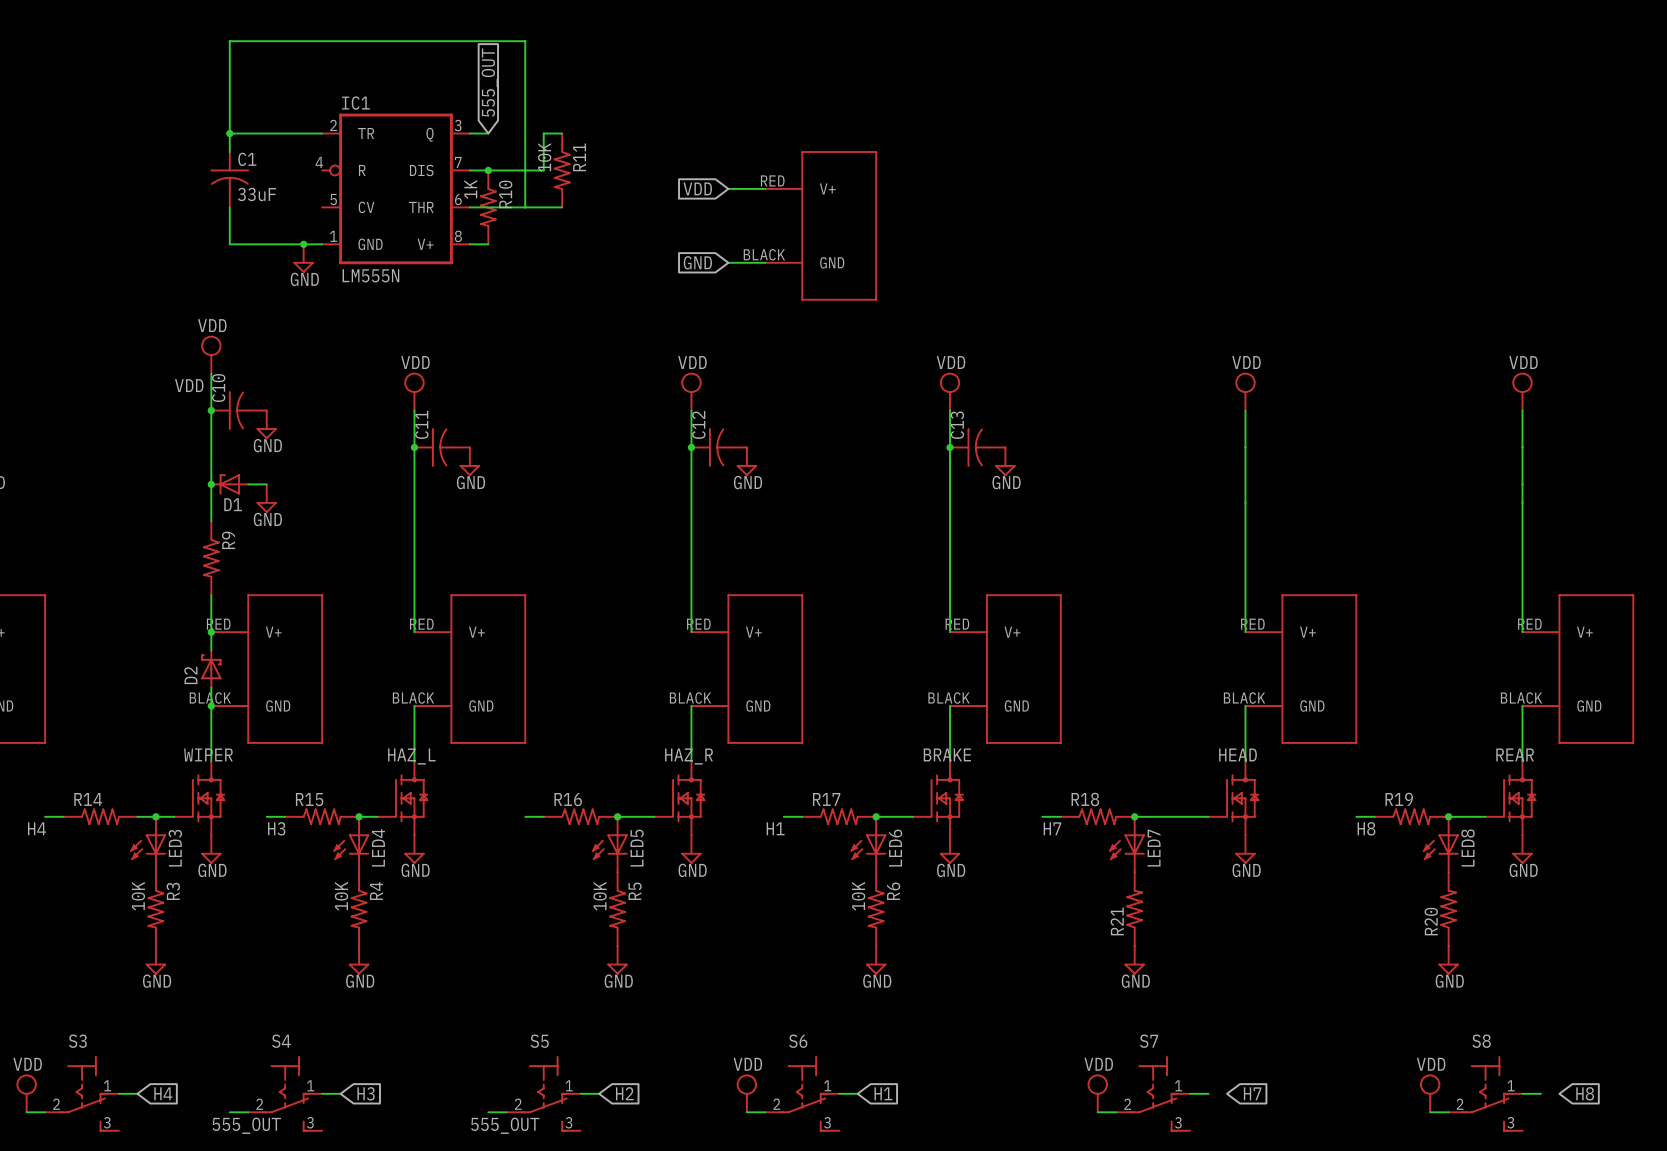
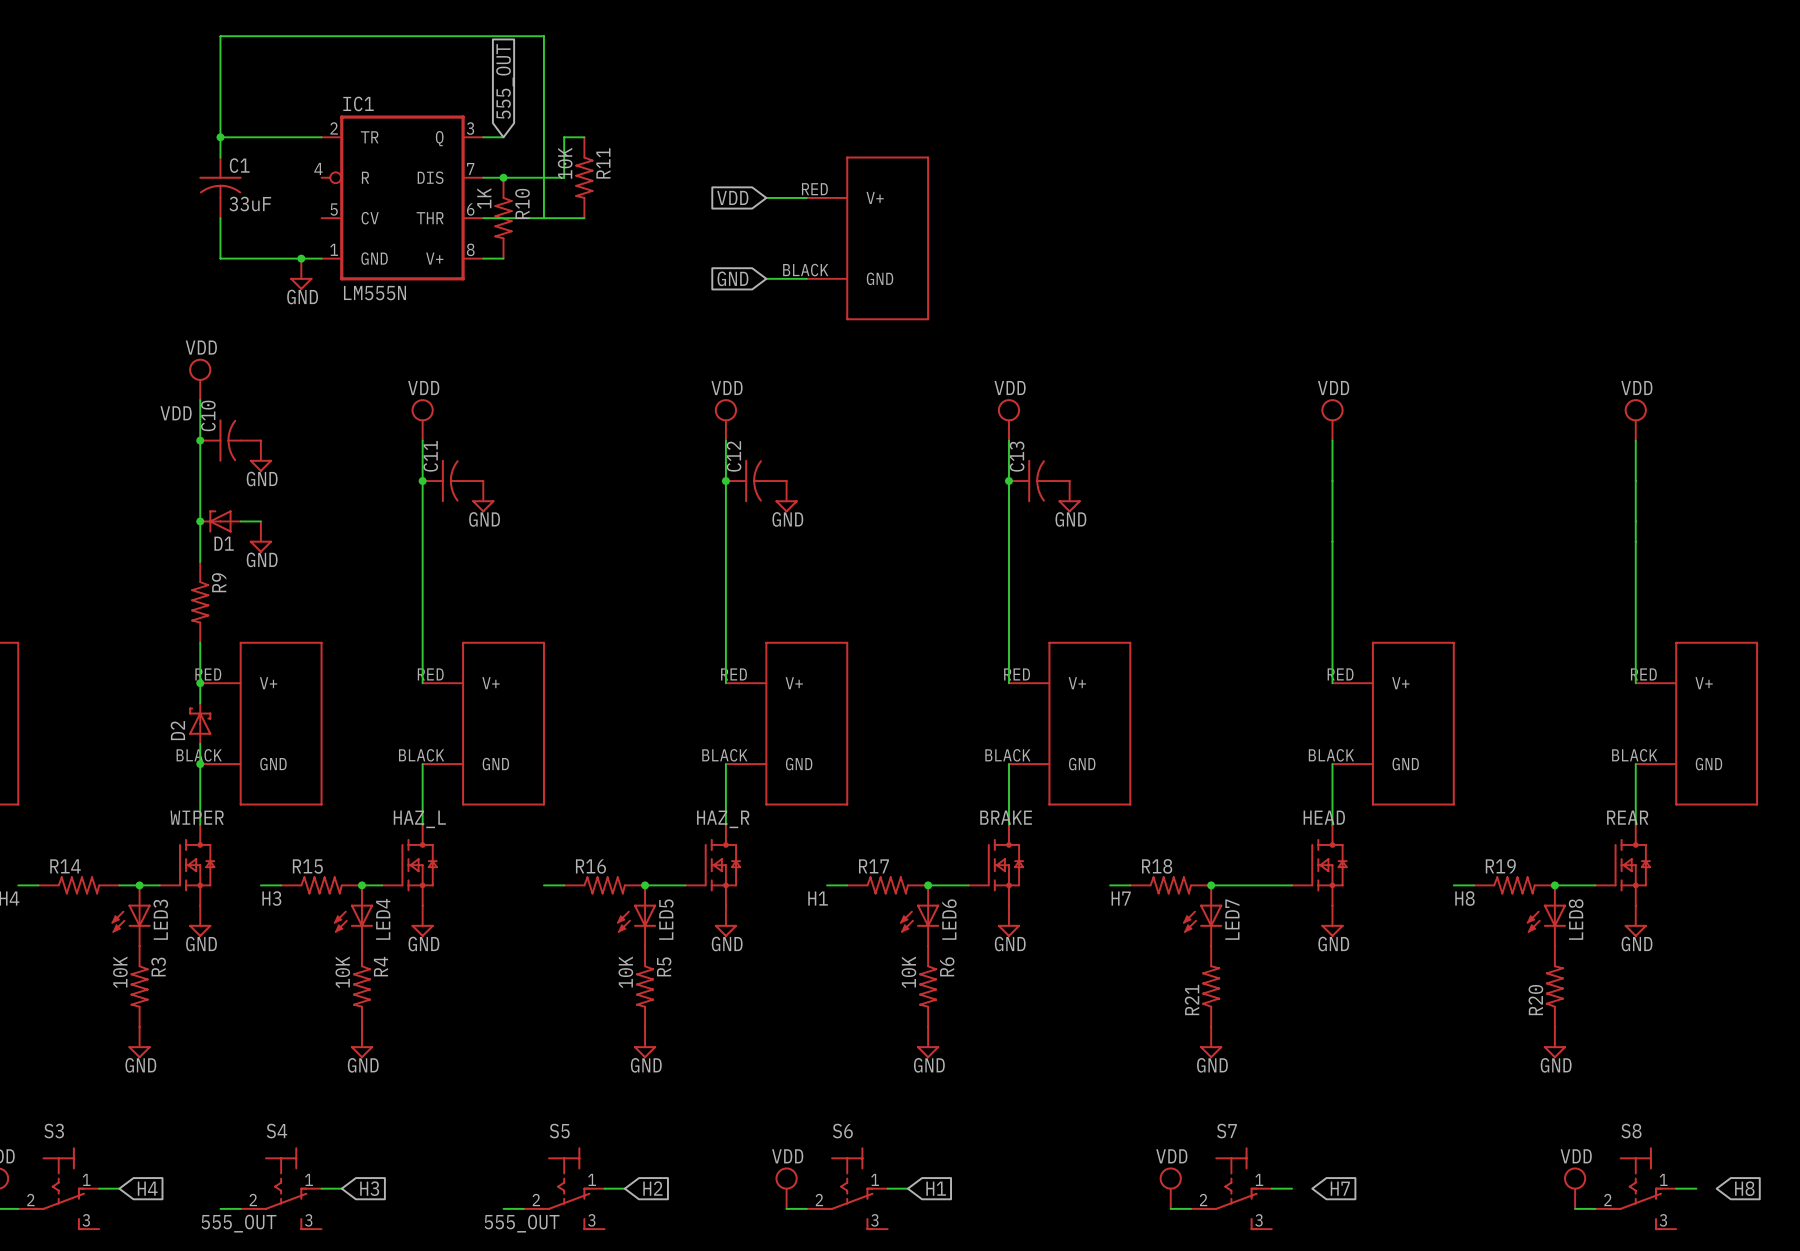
power symbol position: VDD (1430, 1093) -> VDD (1575, 1188)
S8 position: (1485, 1093) -> (1635, 1188)
wire: (1522, 1093) (1540, 1093) -> (1676, 1188) (1696, 1188)
global label position: H8 (1585, 1093) -> H8 (1744, 1188)
wire: (1430, 1112) (1448, 1112) -> (1575, 1208) (1595, 1208)

